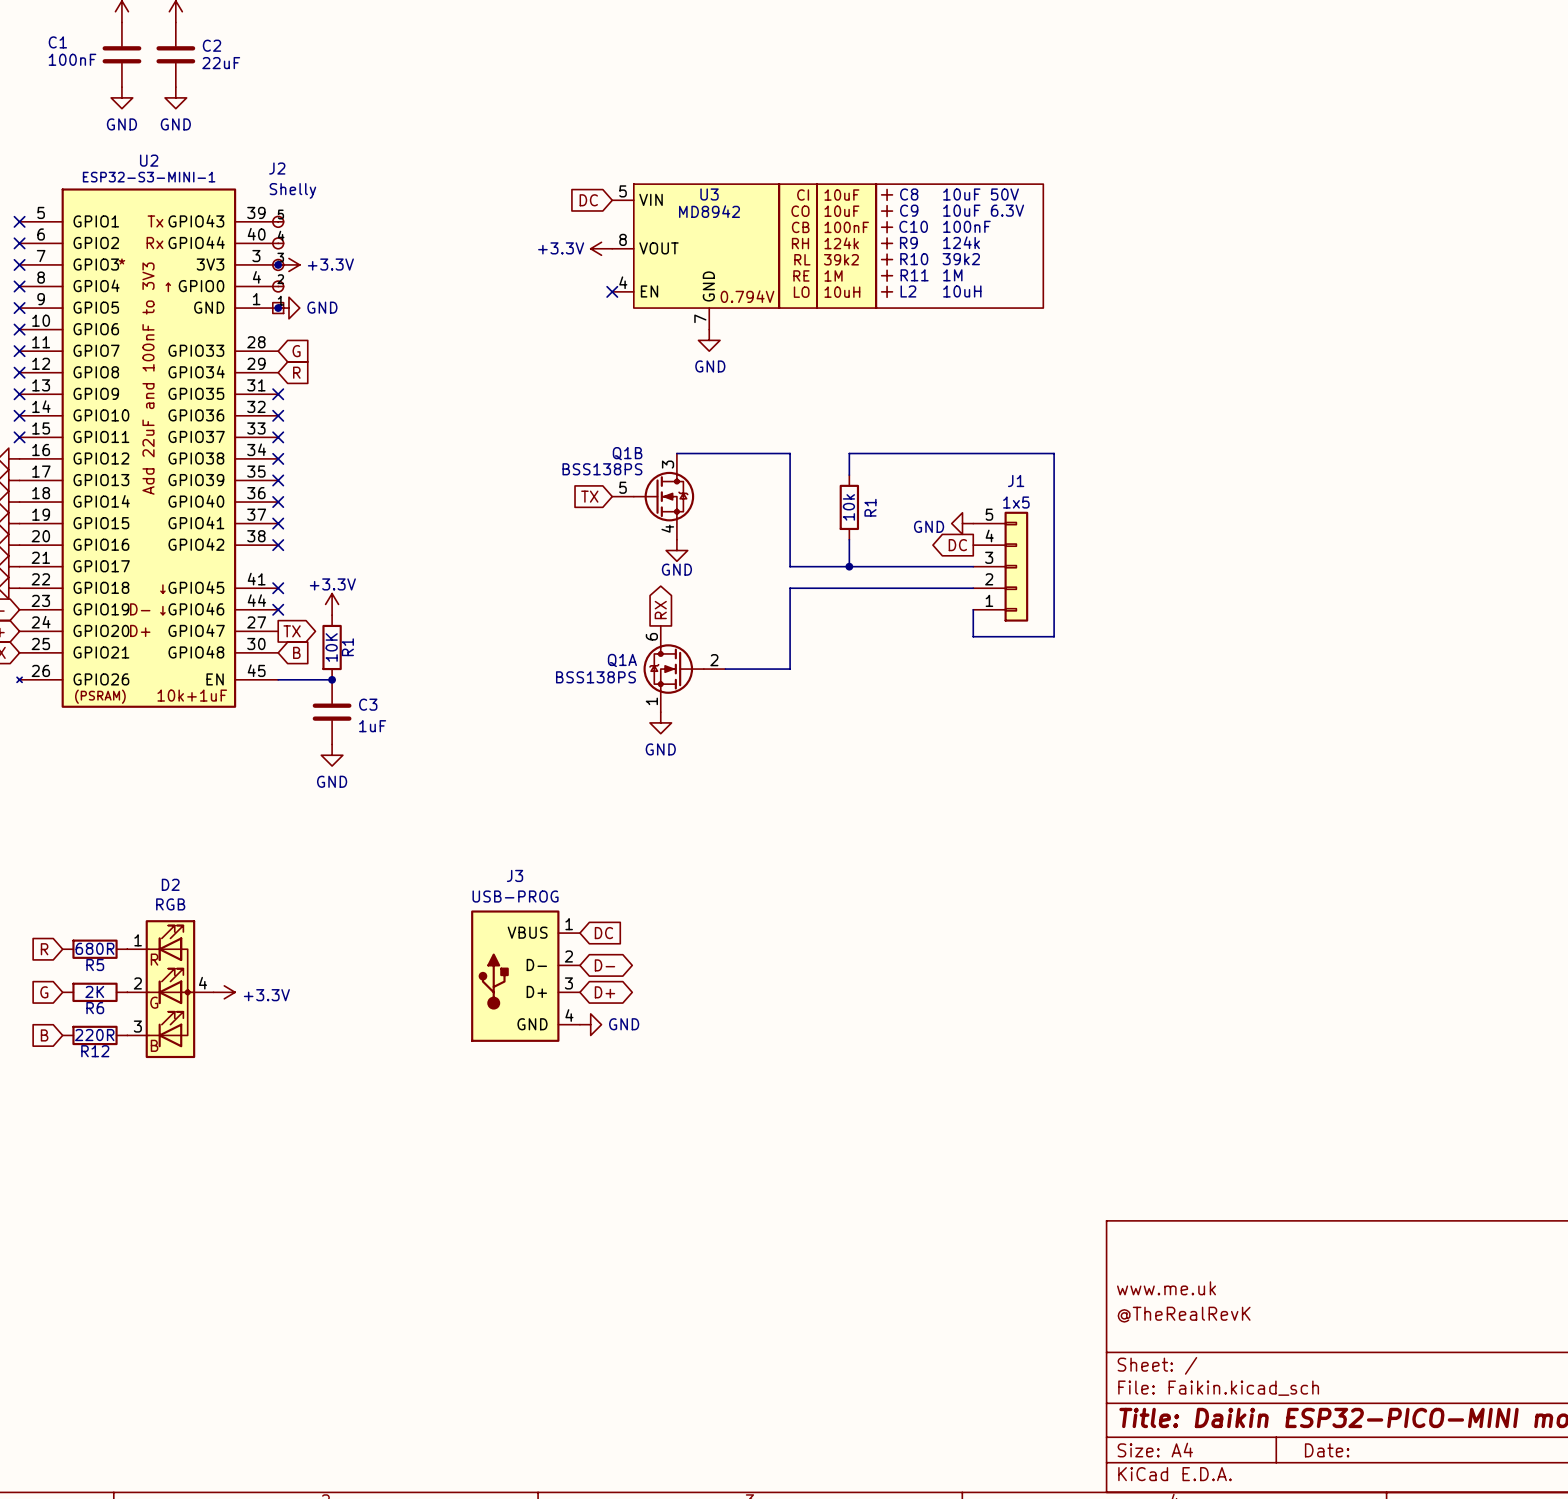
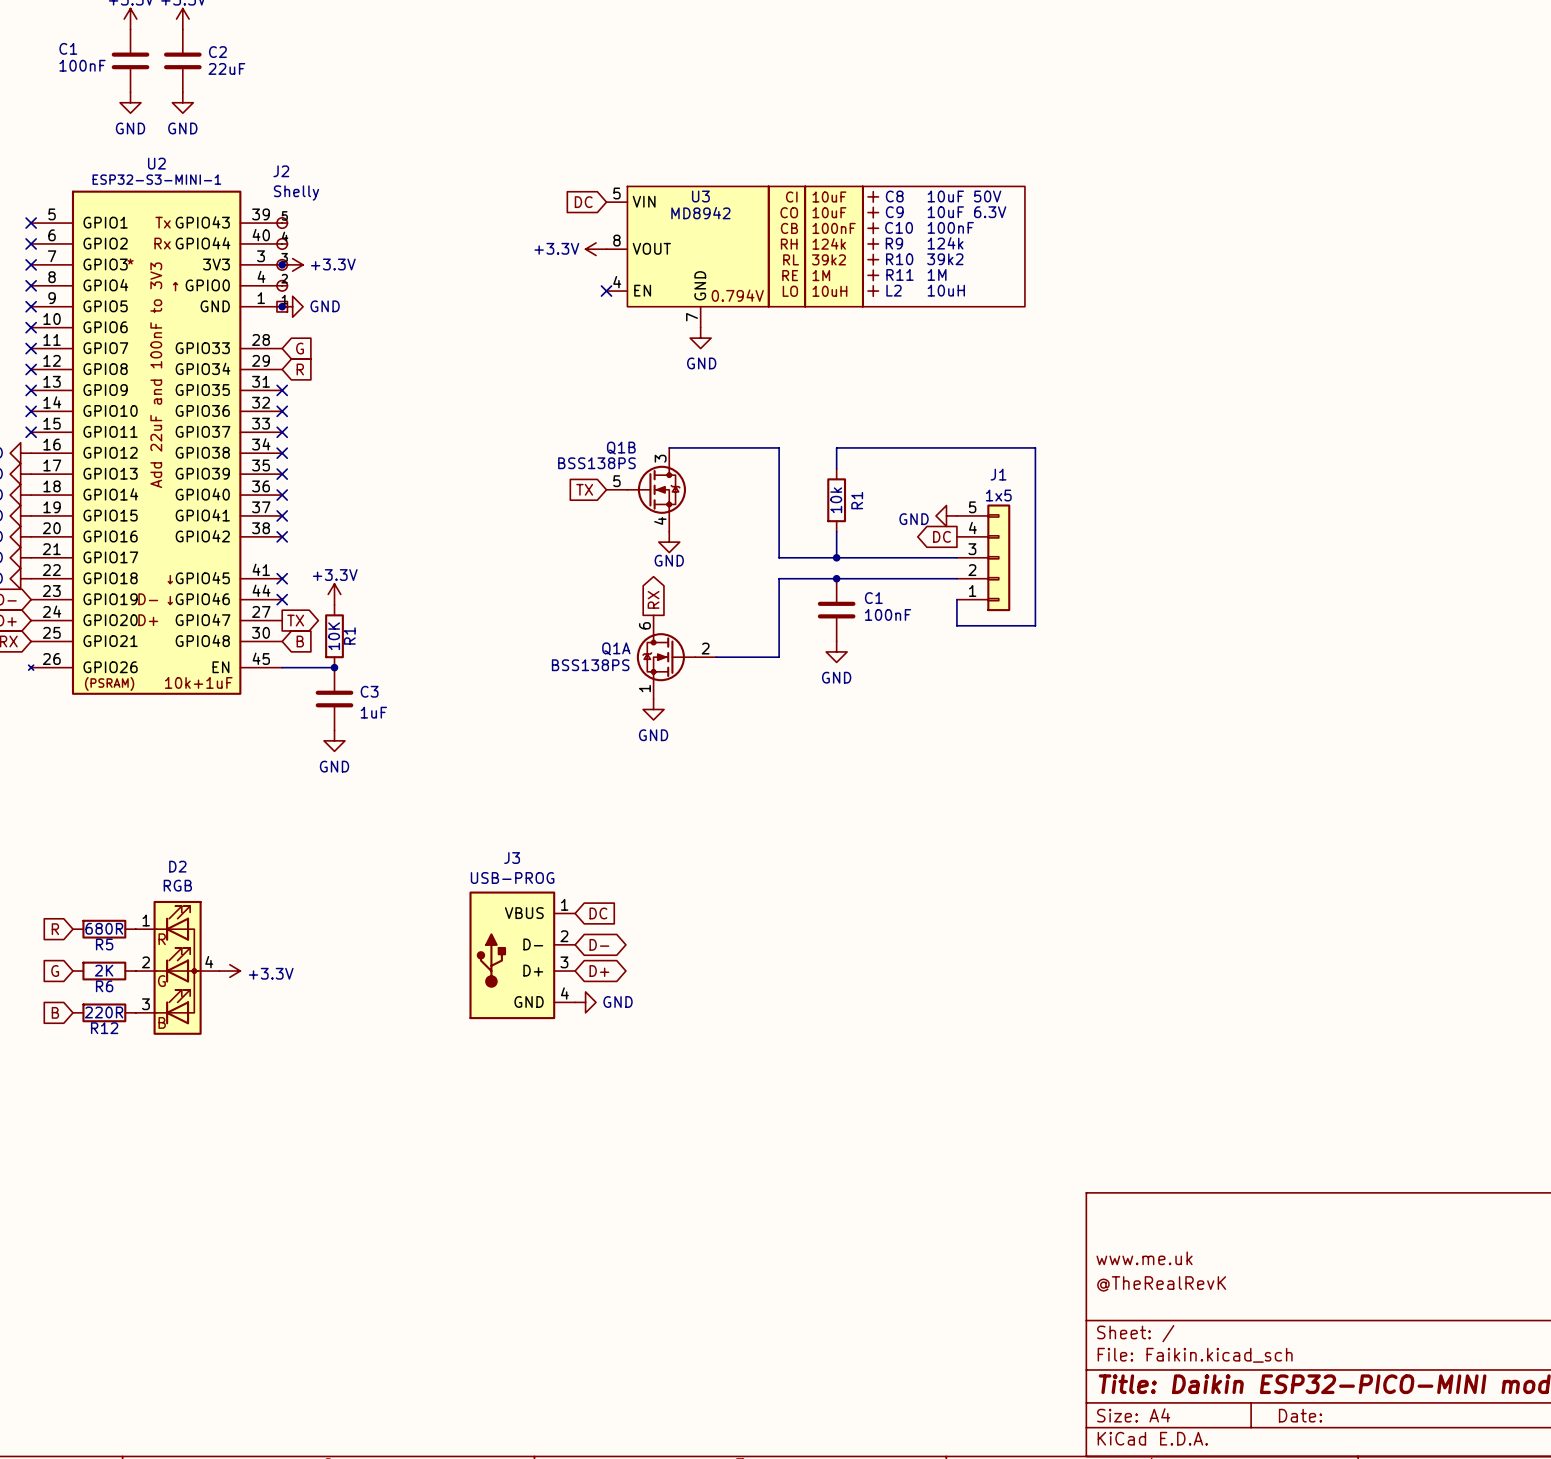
junction: none -> (836, 578)
C1: none -> 100nF (836, 610)
power symbol: none -> GND (836, 651)

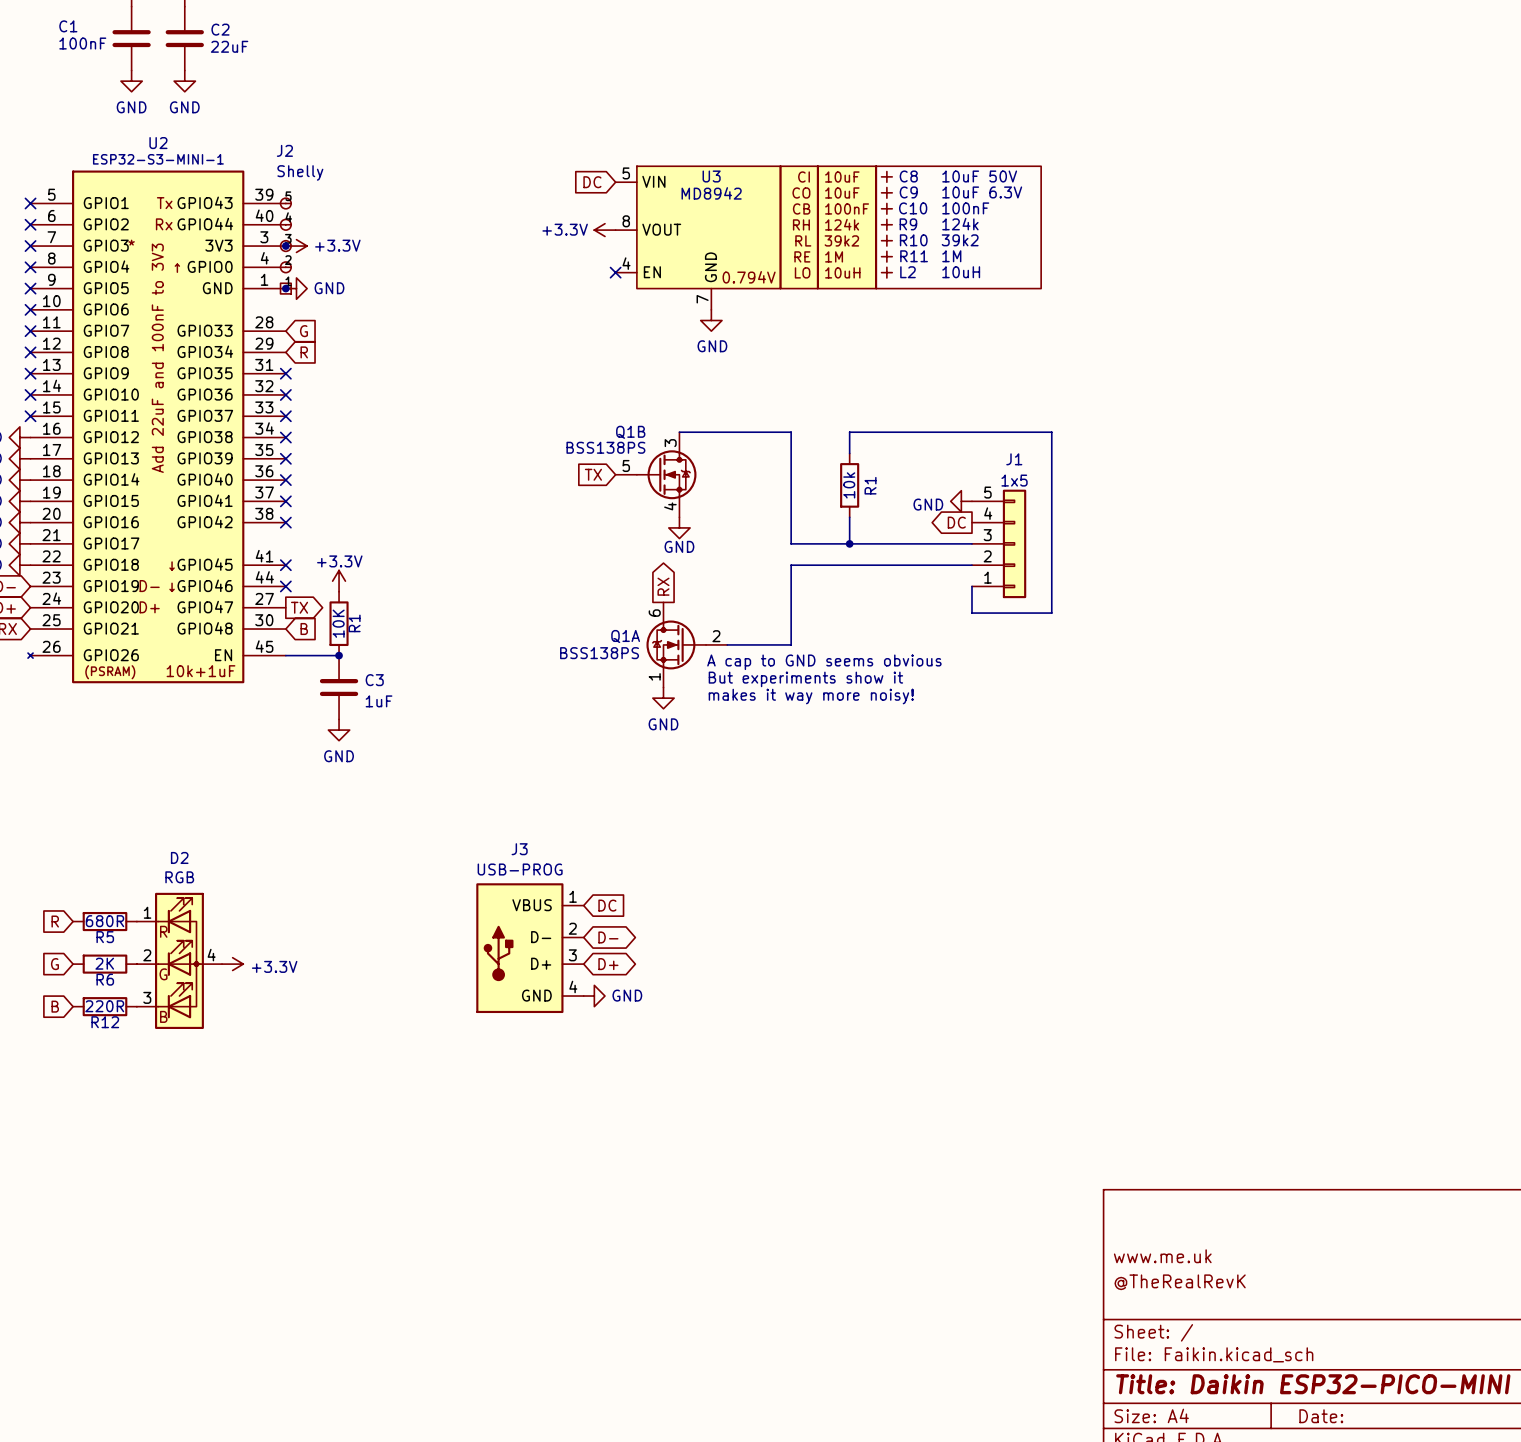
junction: (836, 578) -> none
C1: 100nF (836, 610) -> none
power symbol: GND (836, 651) -> none
text: none -> A cap to GND seems obvious (824, 662)
text: none -> But experiments show it (805, 679)
text: none -> makes it way more noisy! (811, 696)

